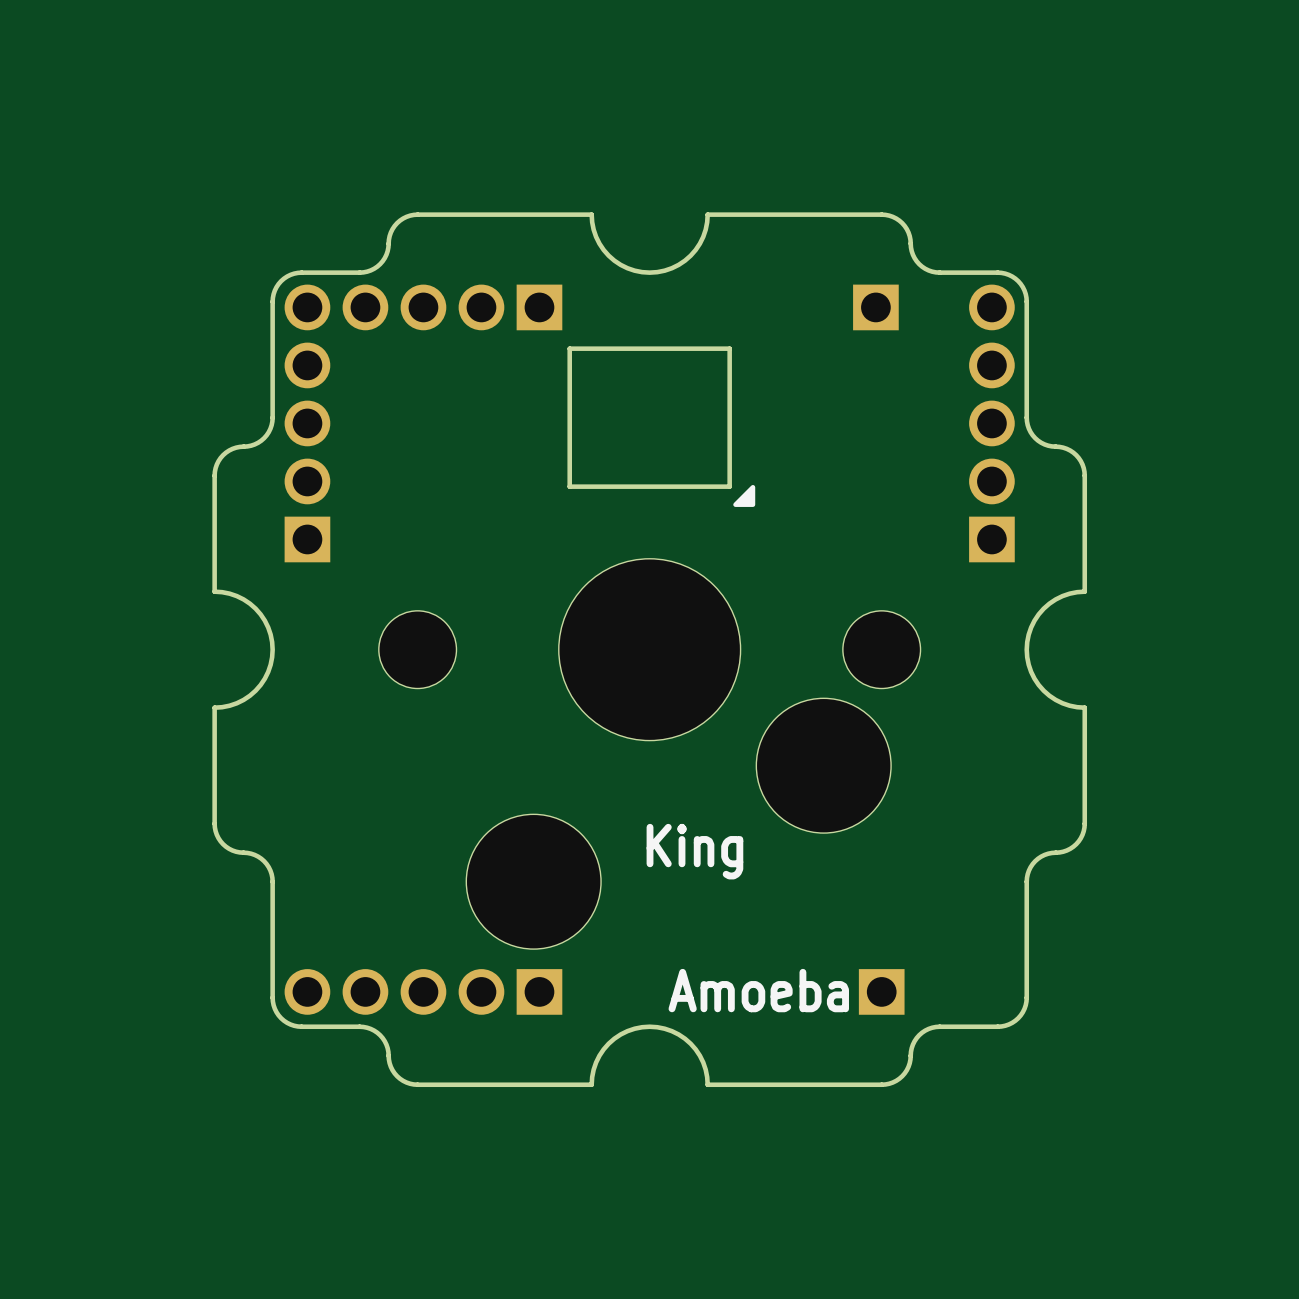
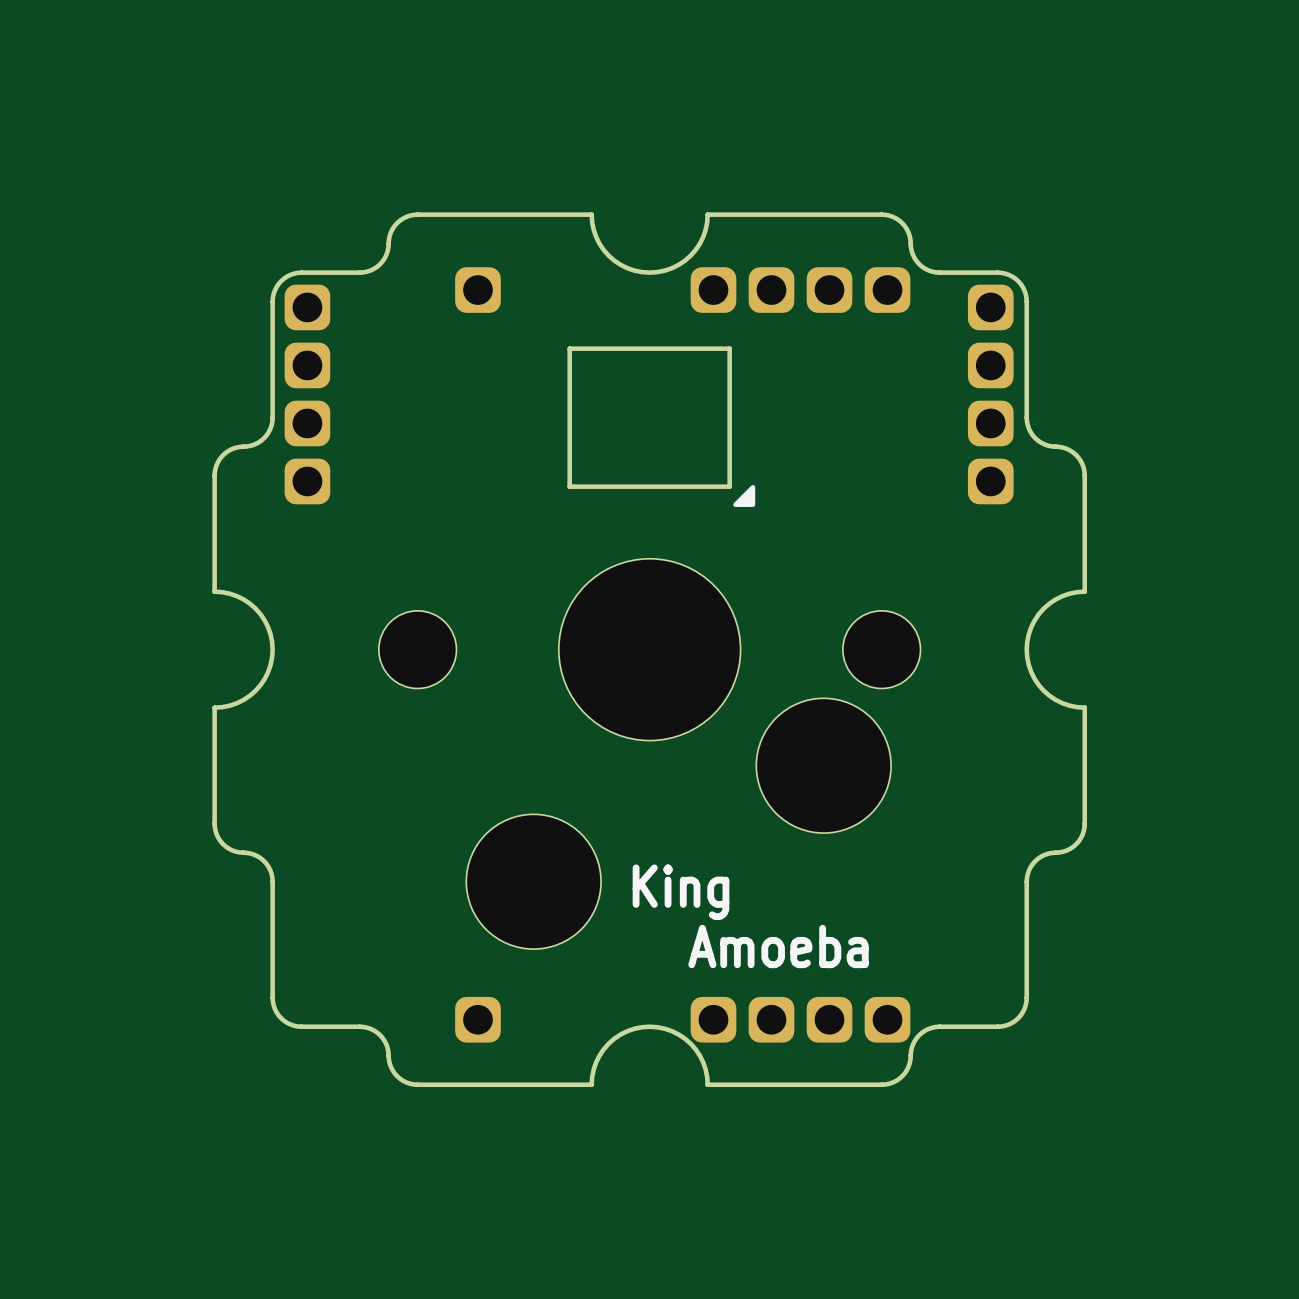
part footprint: [284, 284, 331, 563] -> [284, 284, 331, 505]
part footprint: [342, 284, 563, 331] -> [455, 267, 501, 313]
part footprint: [969, 284, 1015, 563] -> [967, 284, 1014, 505]
part: none -> (800, 290)
part: (875, 307) -> none
text position: King (694, 851) -> King (681, 892)
text position: Amoeba (758, 990) -> Amoeba (778, 946)
part: (423, 991) -> none
part: (881, 991) -> none
part: none -> (477, 1019)
part: none -> (800, 1019)

